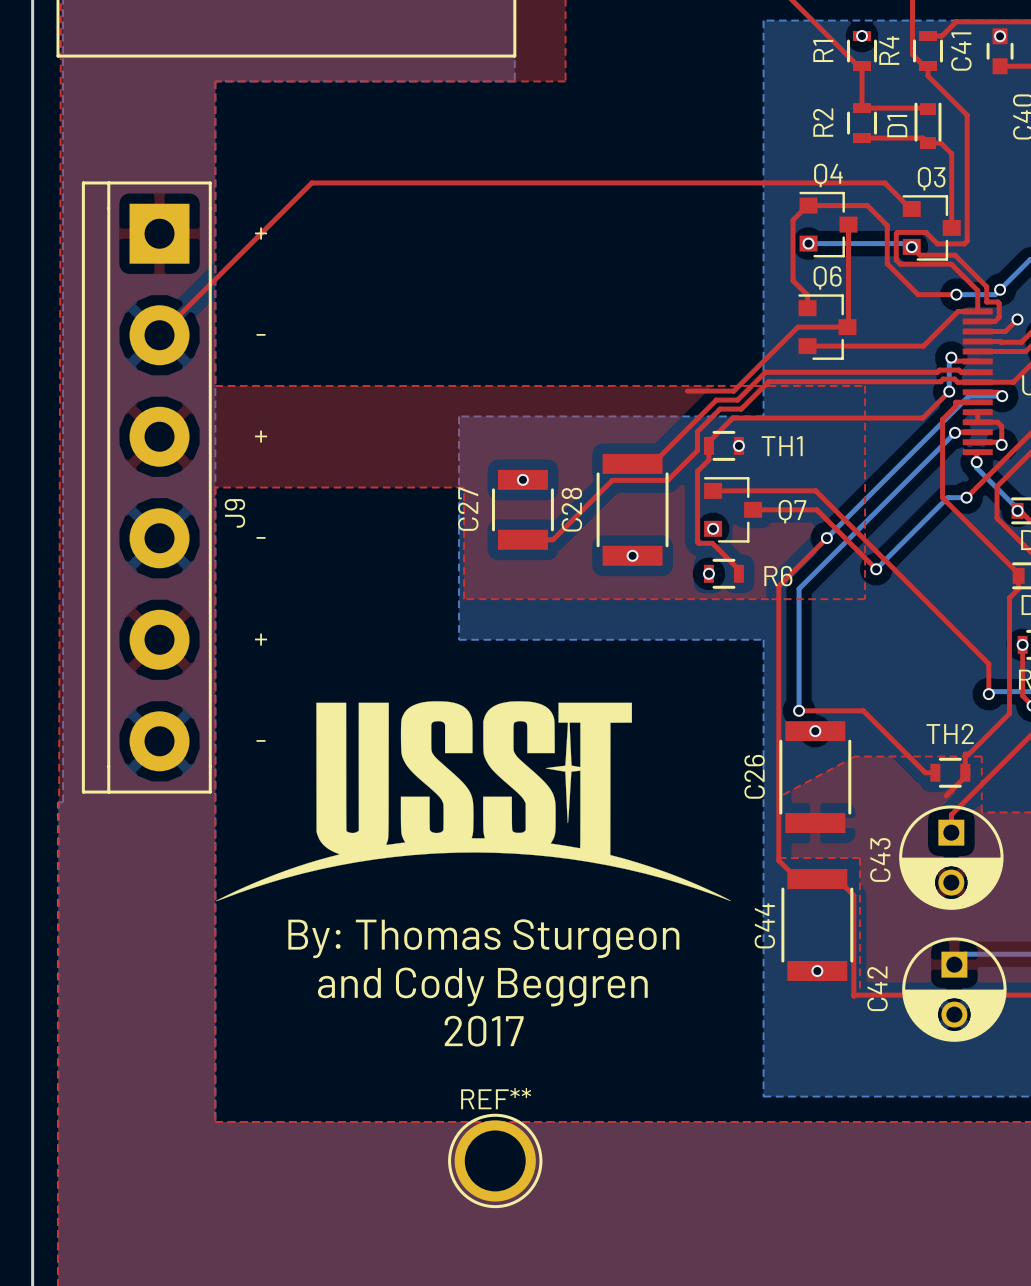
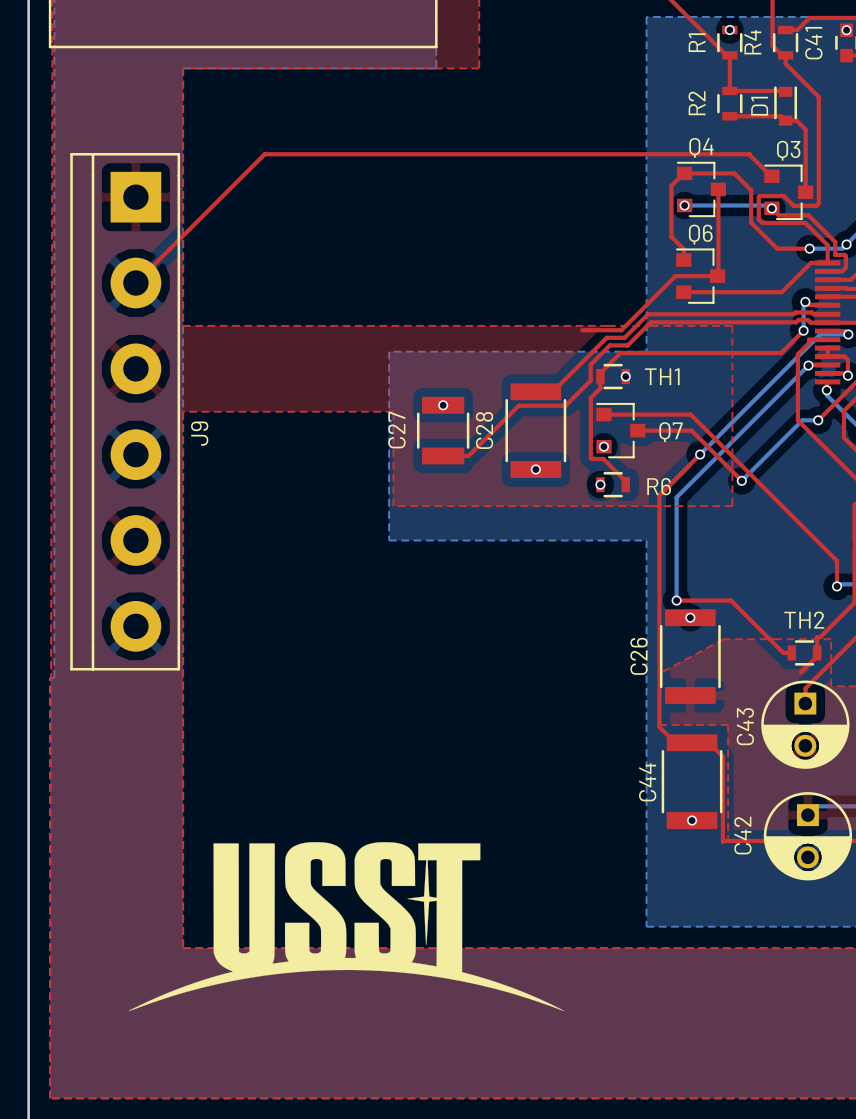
text: + (261, 233) -> none
text: - (261, 334) -> none
text: + (261, 436) -> none
text: - (261, 537) -> none
text: + (261, 639) -> none
text: - (261, 740) -> none
drawing position: (473, 801) -> (346, 926)
text: By: Thomas Sturgeon (483, 938) -> none
text: and Cody Beggren (482, 987) -> none
text: 2017 (484, 1031) -> none
REF**: (495, 1160) -> none

